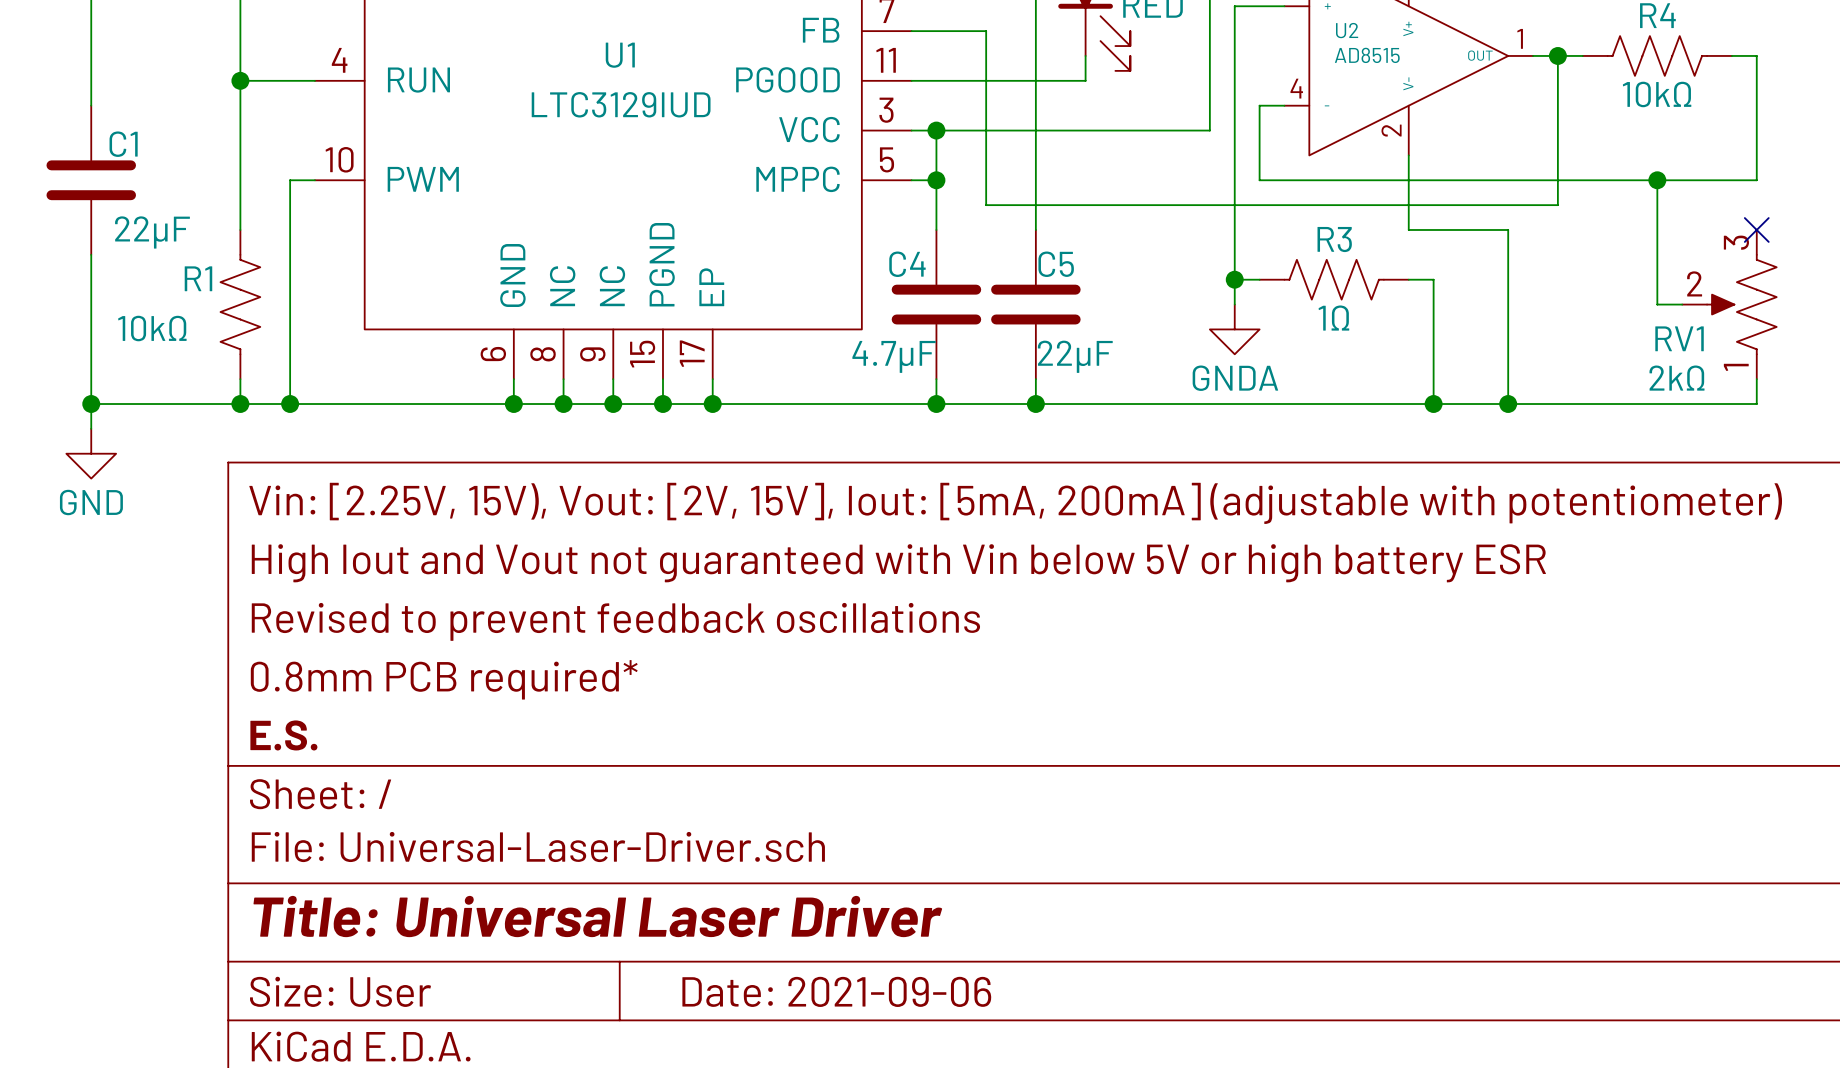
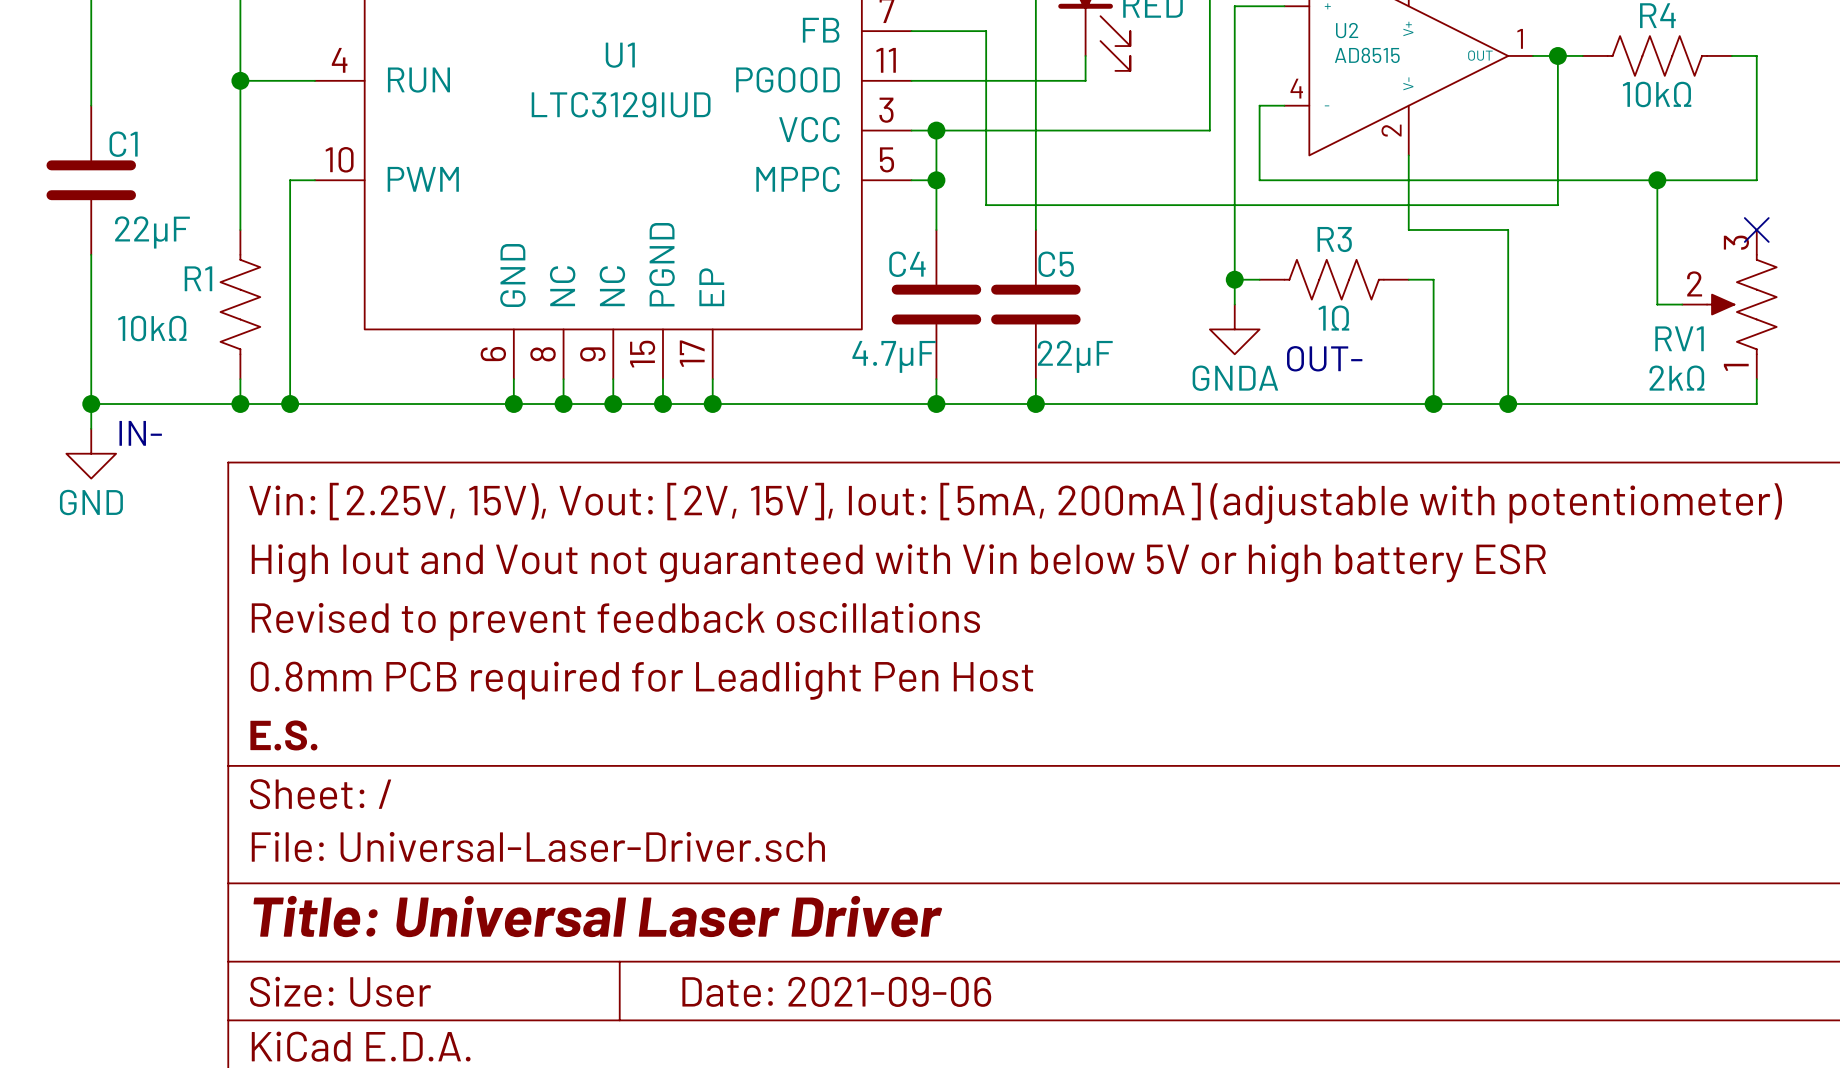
text: none -> OUT- (1324, 358)
text: none -> IN- (140, 433)
title block: 0.8mm PCB required* (444, 679) -> 0.8mm PCB required for Leadlight Pen Host (642, 680)

